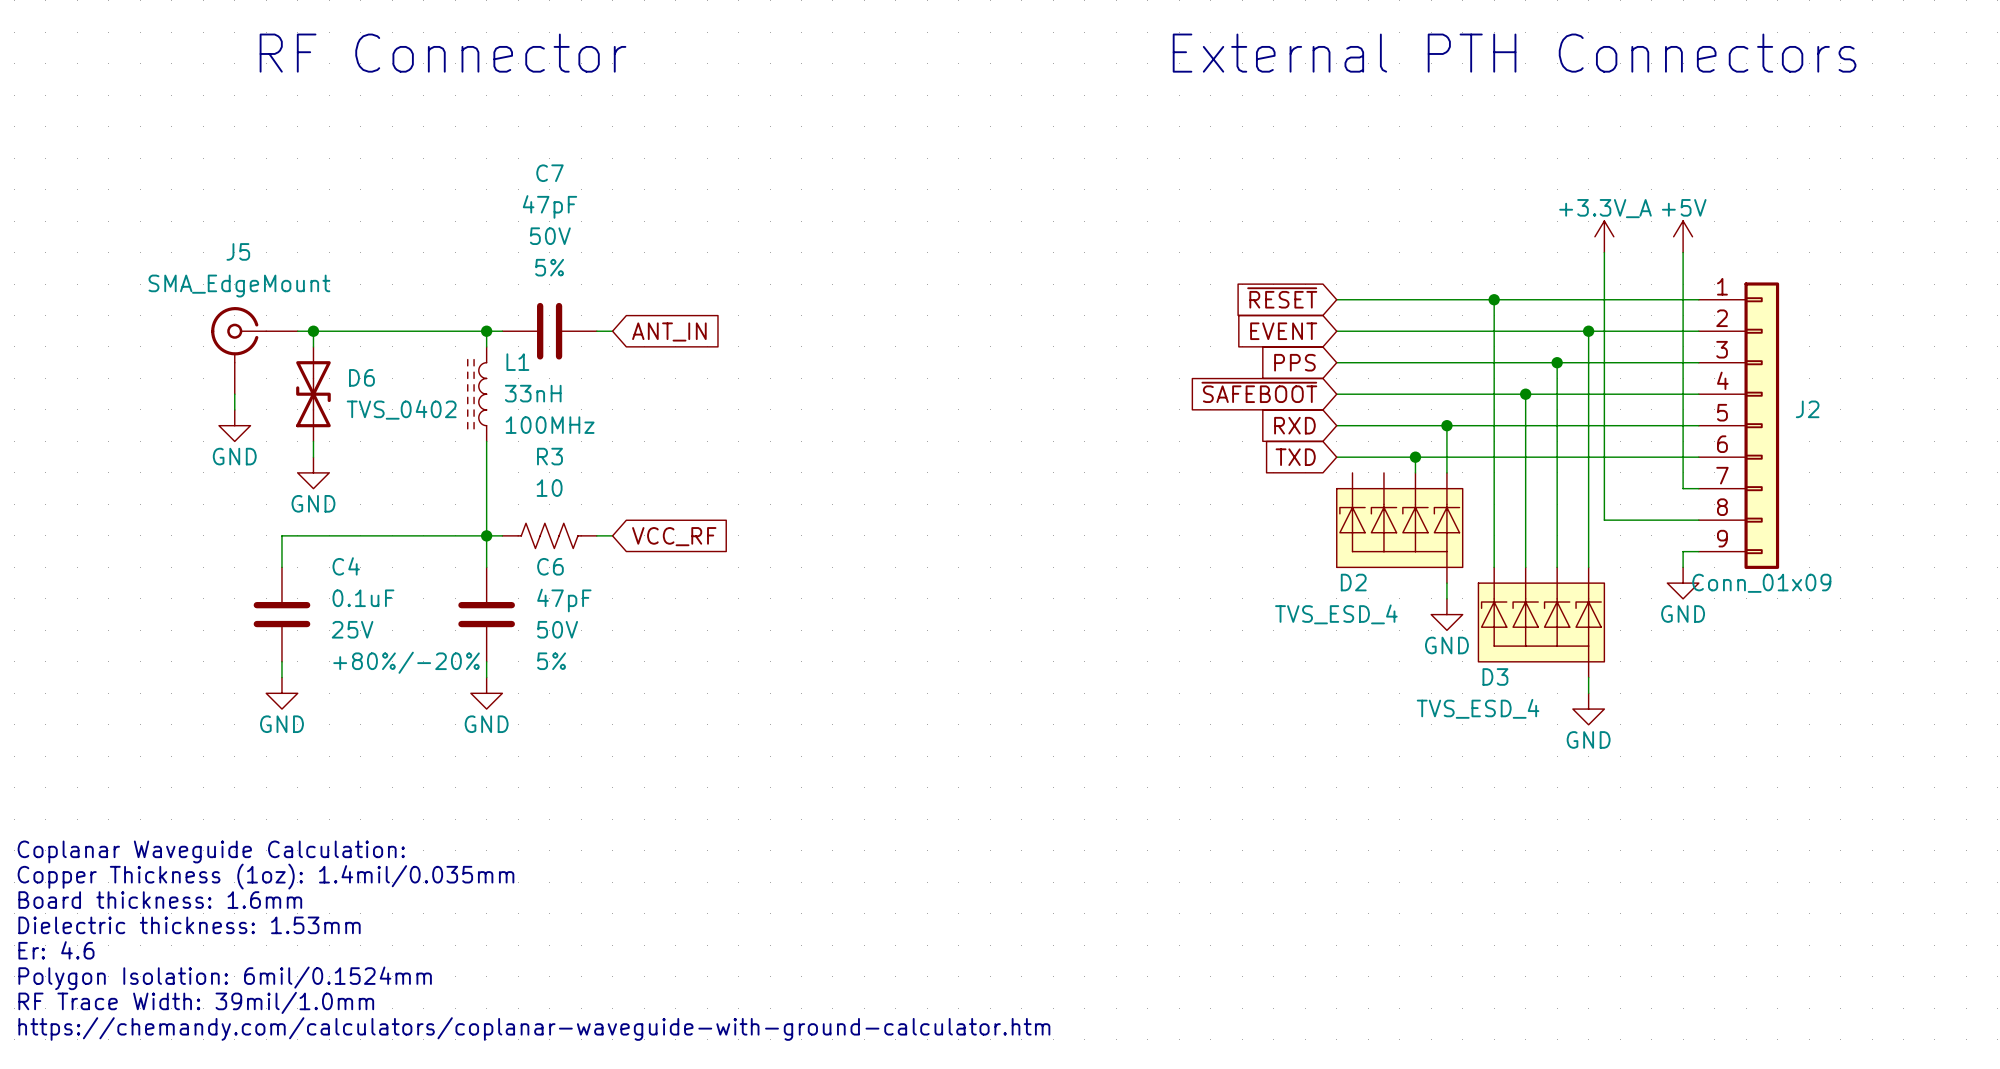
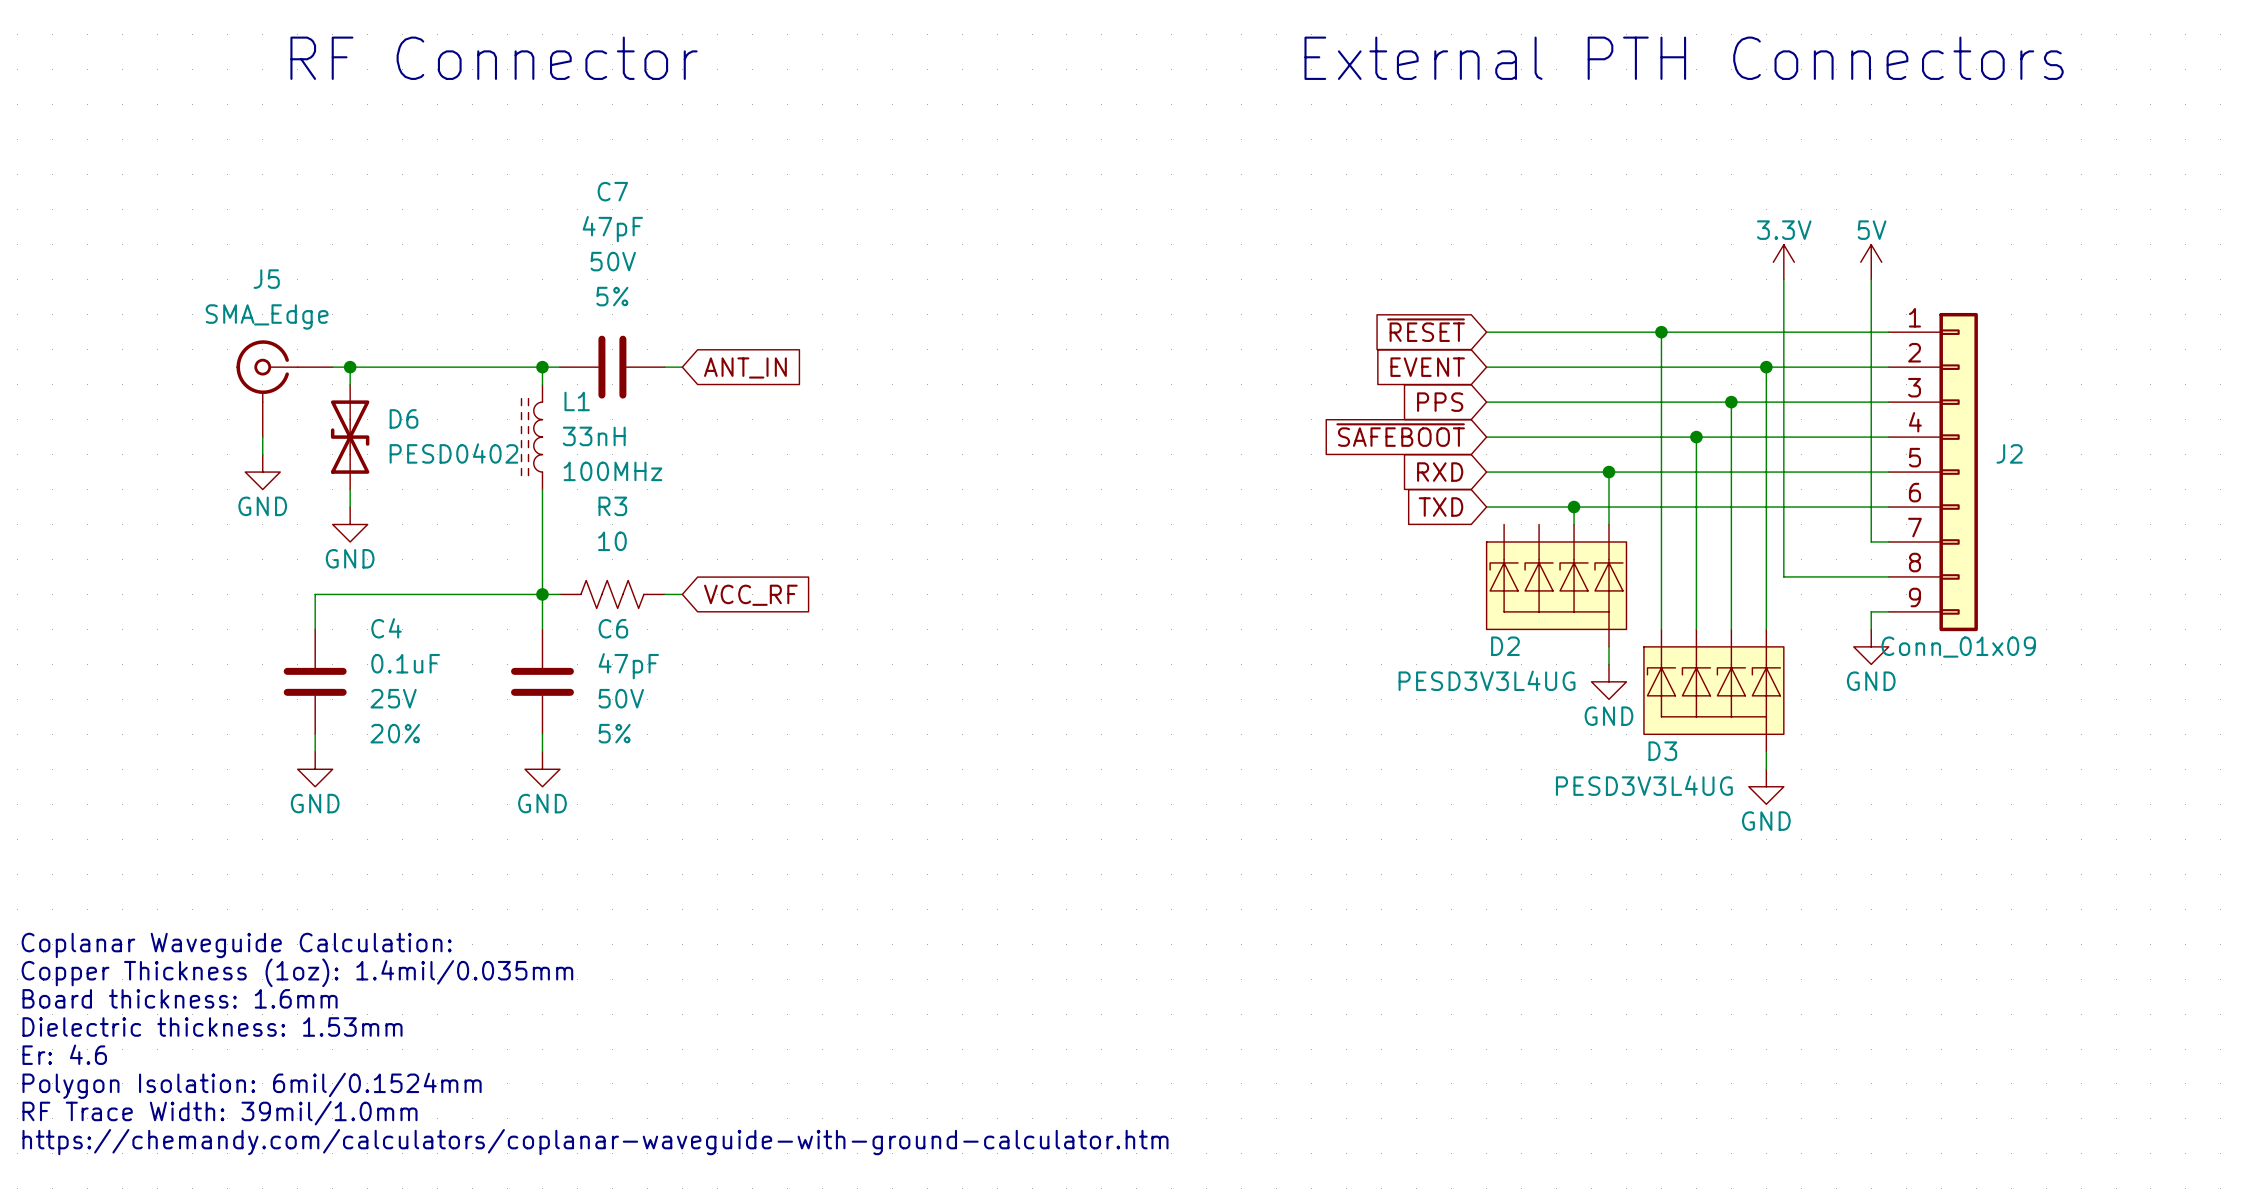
power symbol: +3.3V_A (1604, 236) -> 3.3V (1783, 262)
power symbol: +5V (1683, 236) -> 5V (1871, 262)
J5 value: SMA_EdgeMount (239, 286) -> SMA_Edge (267, 316)
D6 value: TVS_0402 (401, 409) -> PESD0402 (453, 453)
D2 value: TVS_ESD_4 (1336, 614) -> PESD3V3L4UG (1487, 680)
C4 text: +80%/-20% (406, 662) -> 20% (395, 733)
D3 value: TVS_ESD_4 (1478, 708) -> PESD3V3L4UG (1644, 785)

